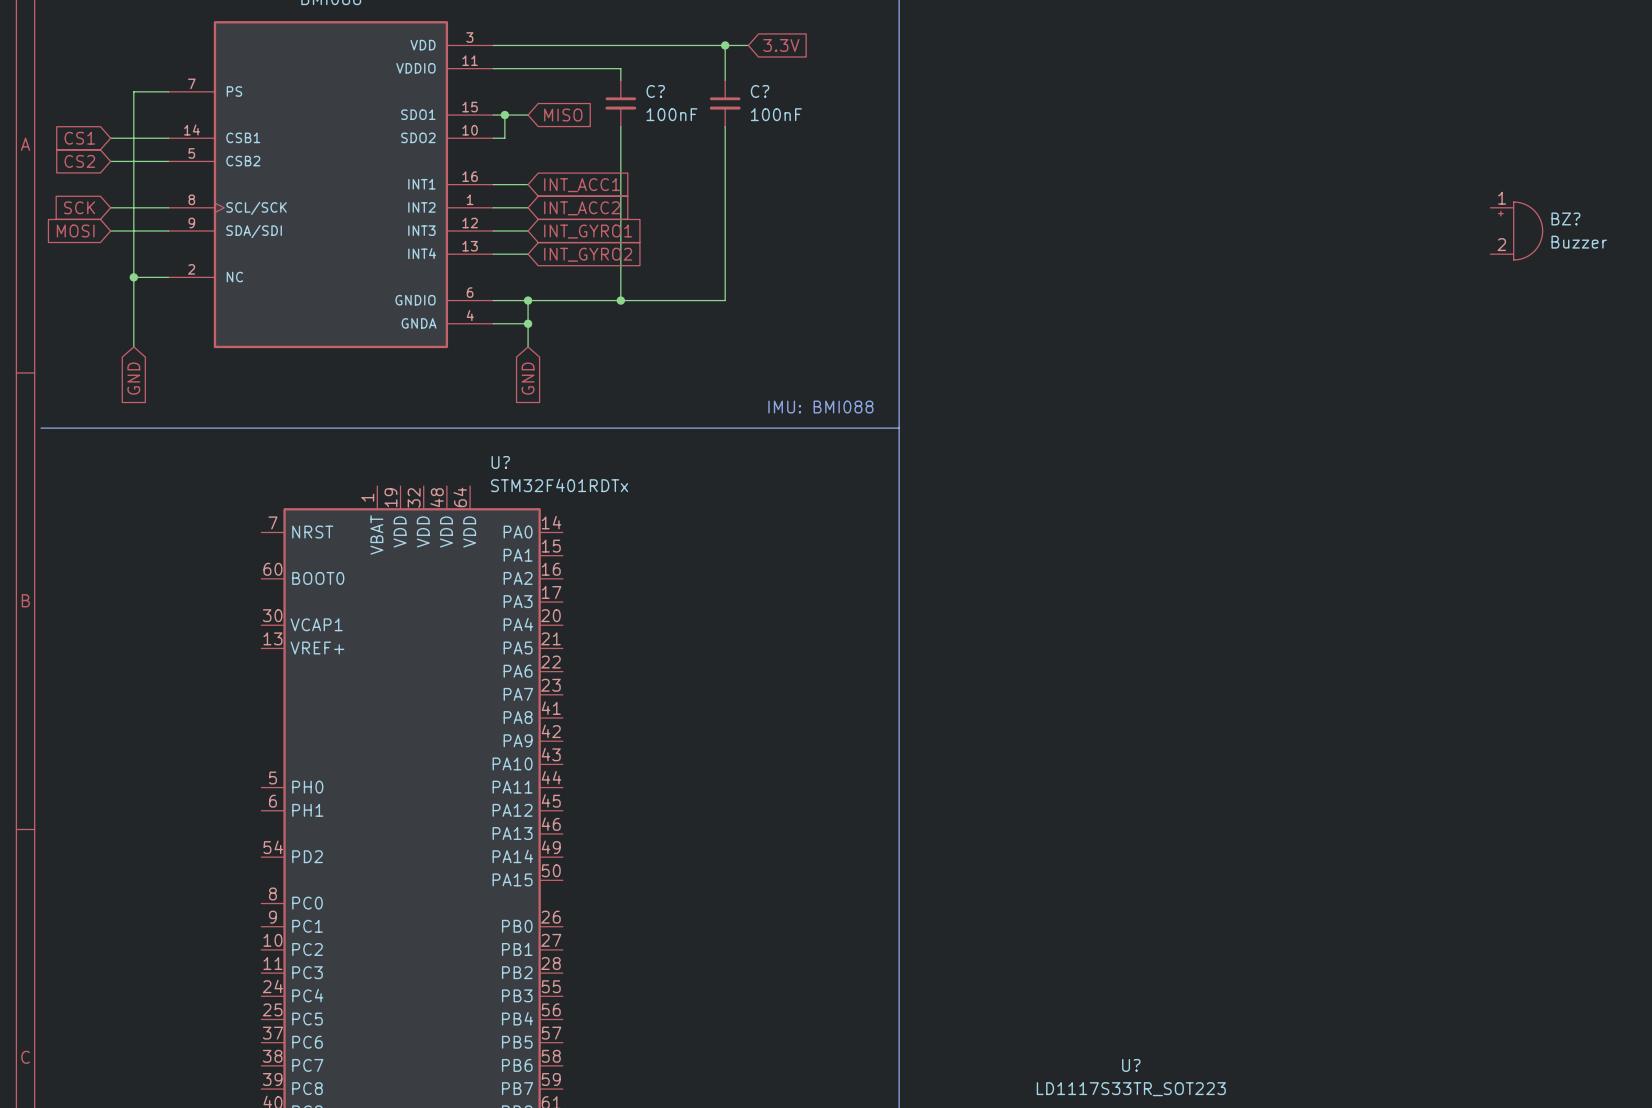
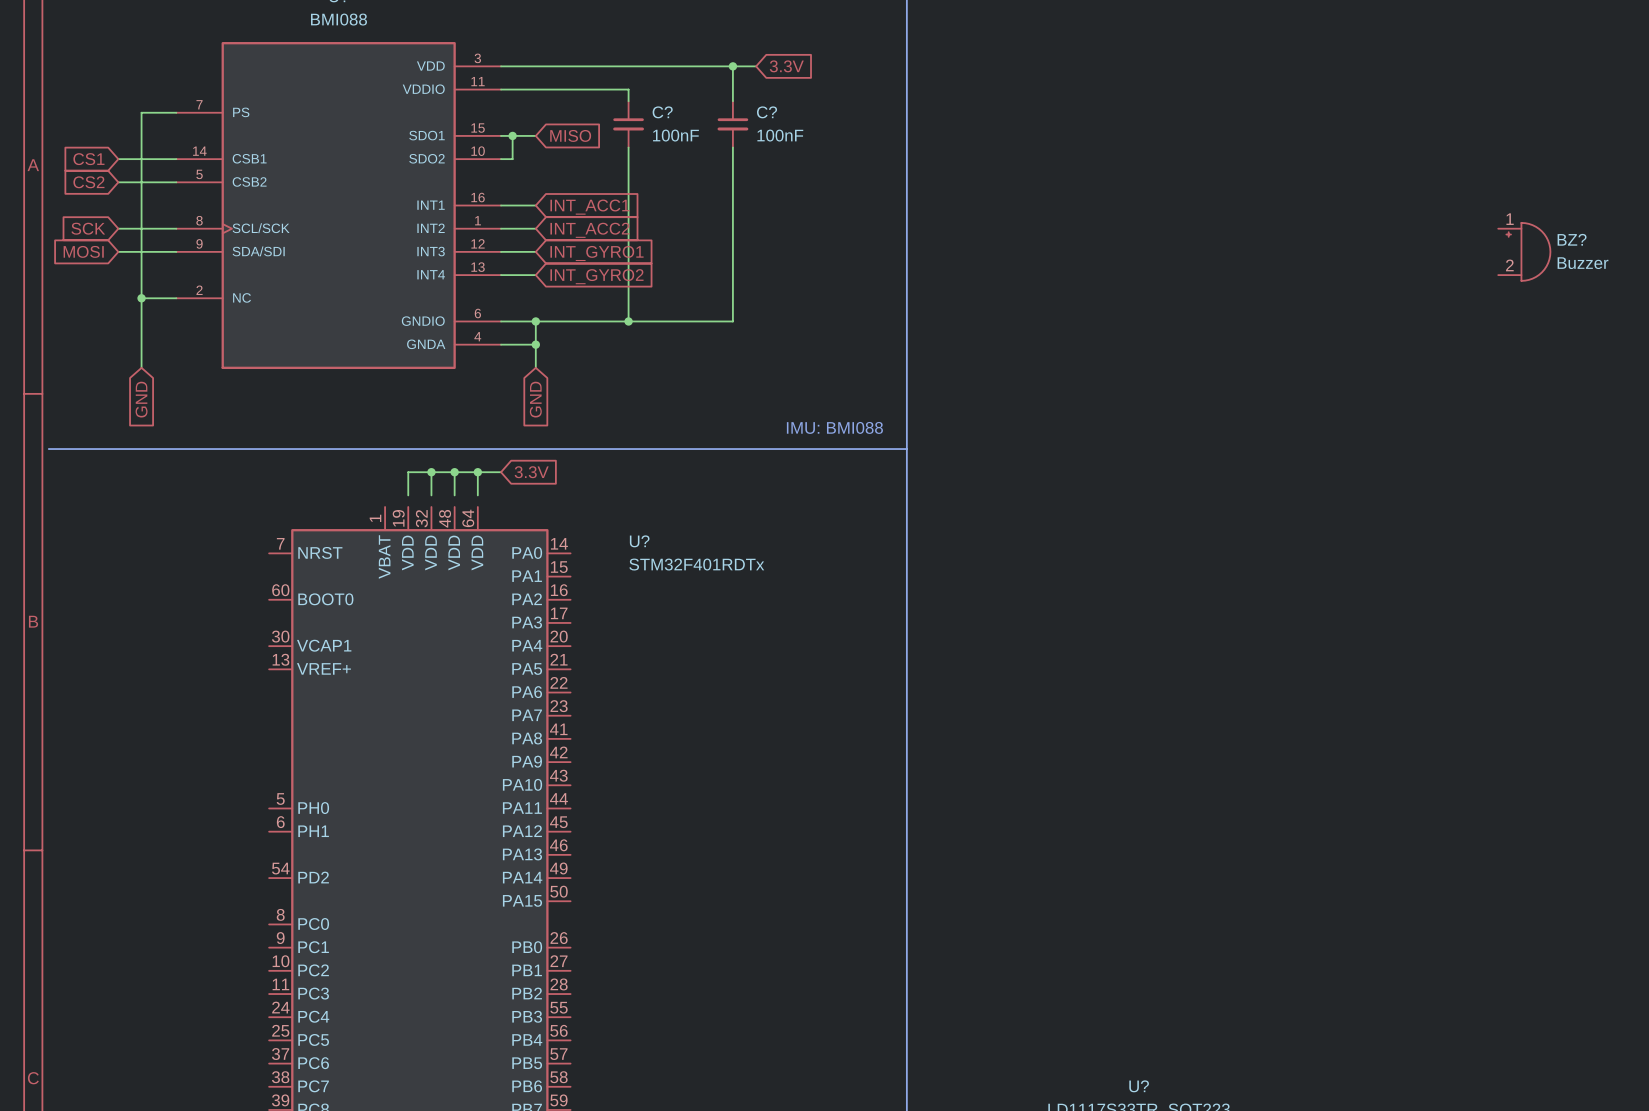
wire: none -> (431, 472) (431, 495)
junction: none -> (431, 472)
wire: none -> (454, 472) (454, 495)
junction: none -> (454, 472)
wire: none -> (477, 472) (477, 495)
junction: none -> (477, 472)
wire: none -> (501, 472) (408, 472) (408, 495)
global label: none -> 3.3V (531, 472)
U? name position: U? (500, 462) -> U? (639, 541)
U? value position: STM32F401RDTx (559, 485) -> STM32F401RDTx (696, 564)

